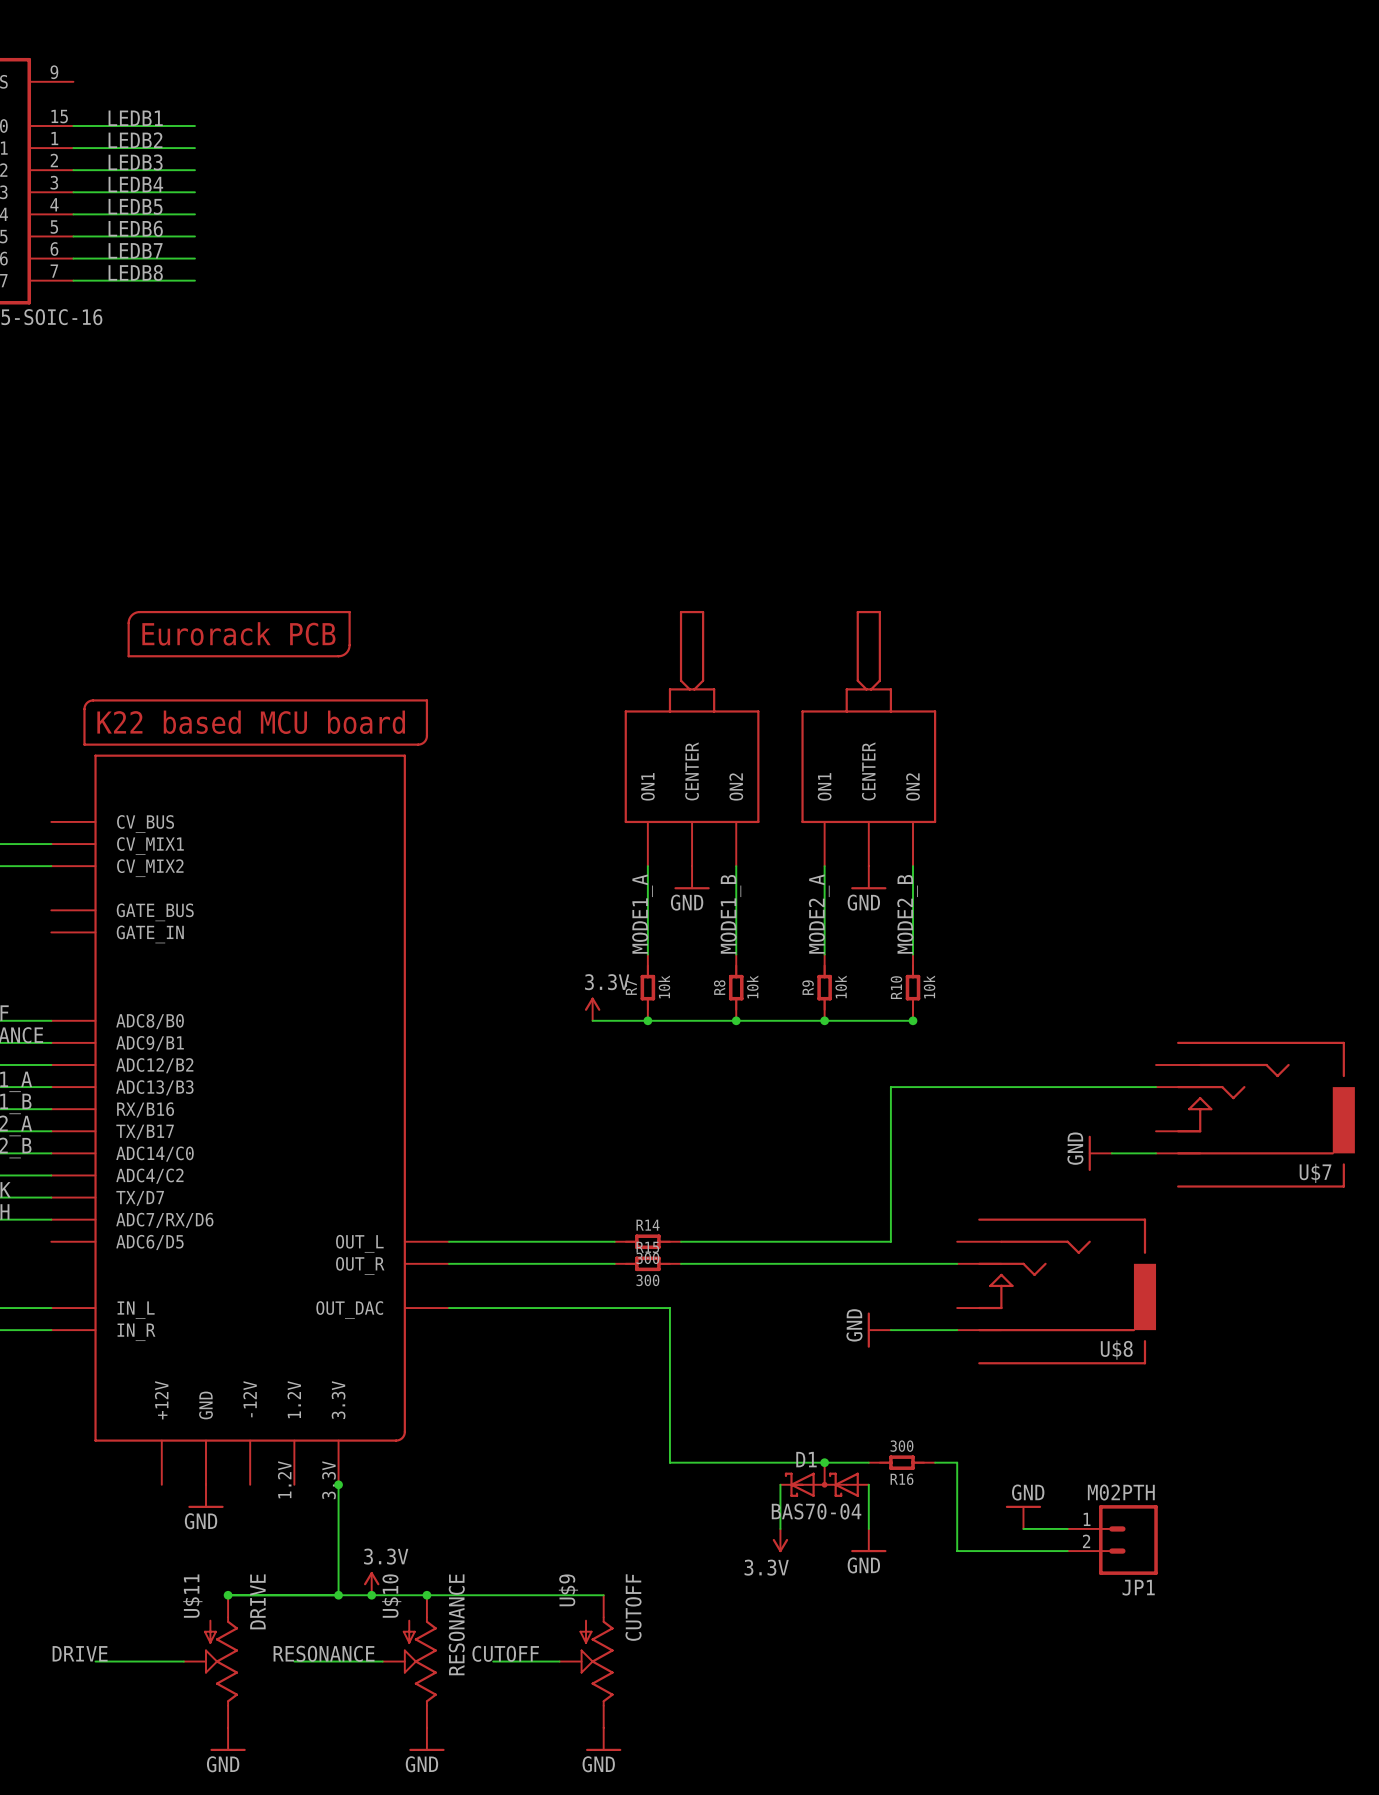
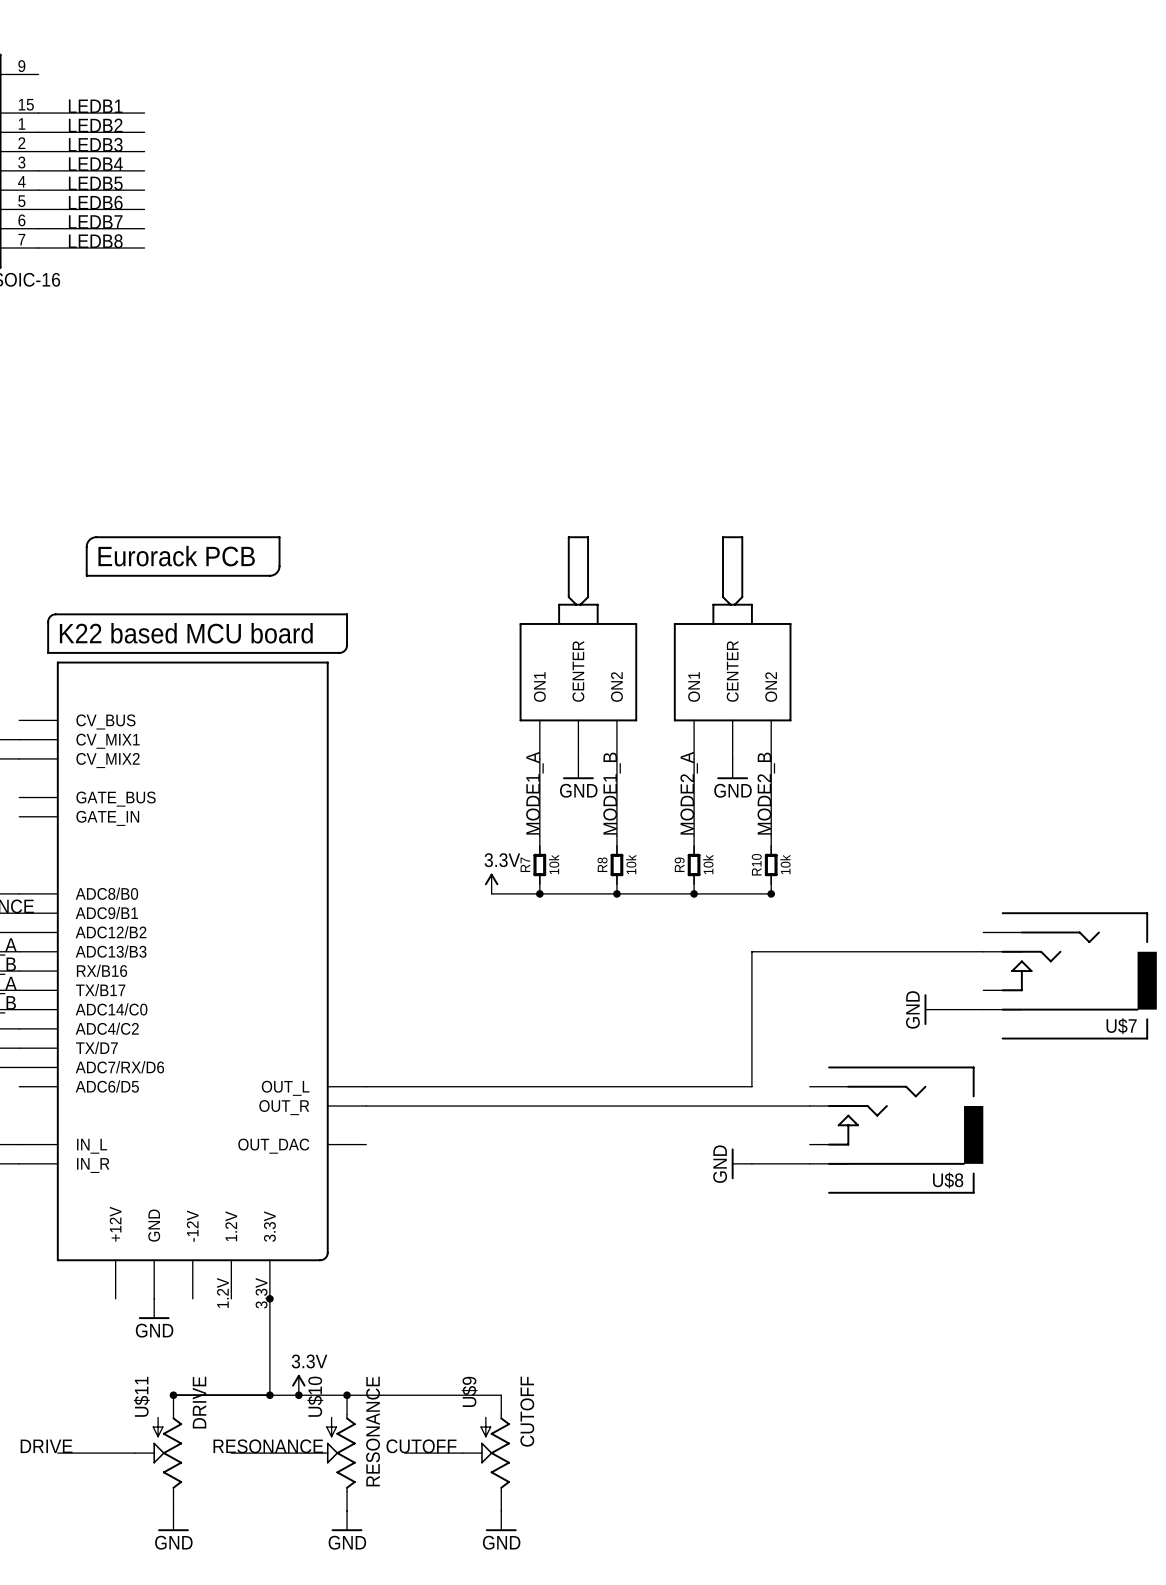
R14: 300 (647, 1241) -> none
R15: 300 (647, 1263) -> none
wire: (449, 1308) (669, 1308) (669, 1462) (868, 1462) -> none
junction: (824, 1462) -> none
R16: 300 (901, 1462) -> none
wire: (935, 1462) (957, 1462) (957, 1551) (1067, 1551) -> none
D1: BAS70-04 (824, 1479) -> none
wire: (780, 1484) (780, 1528) -> none
wire: (868, 1484) (868, 1528) -> none
power symbol: GND (1023, 1517) -> none
wire: (1023, 1528) (1067, 1528) -> none
power symbol: 3.3V (780, 1540) -> none
power symbol: GND (868, 1540) -> none
JP1: M02PTH (1112, 1540) -> none

